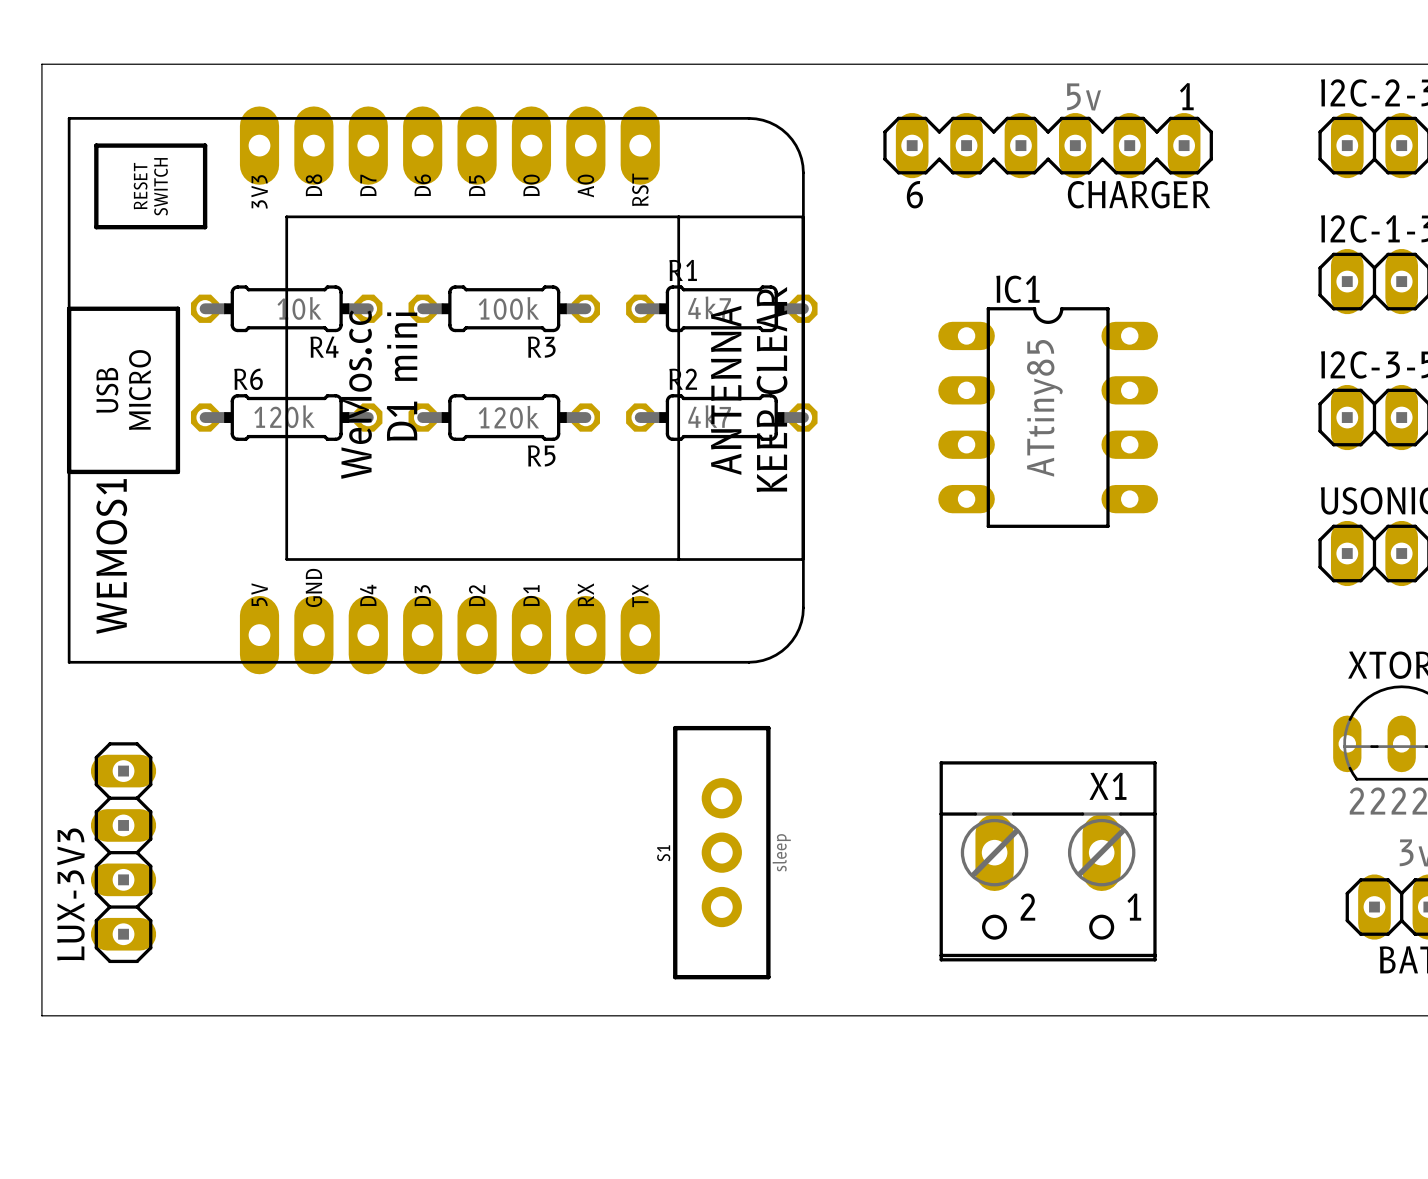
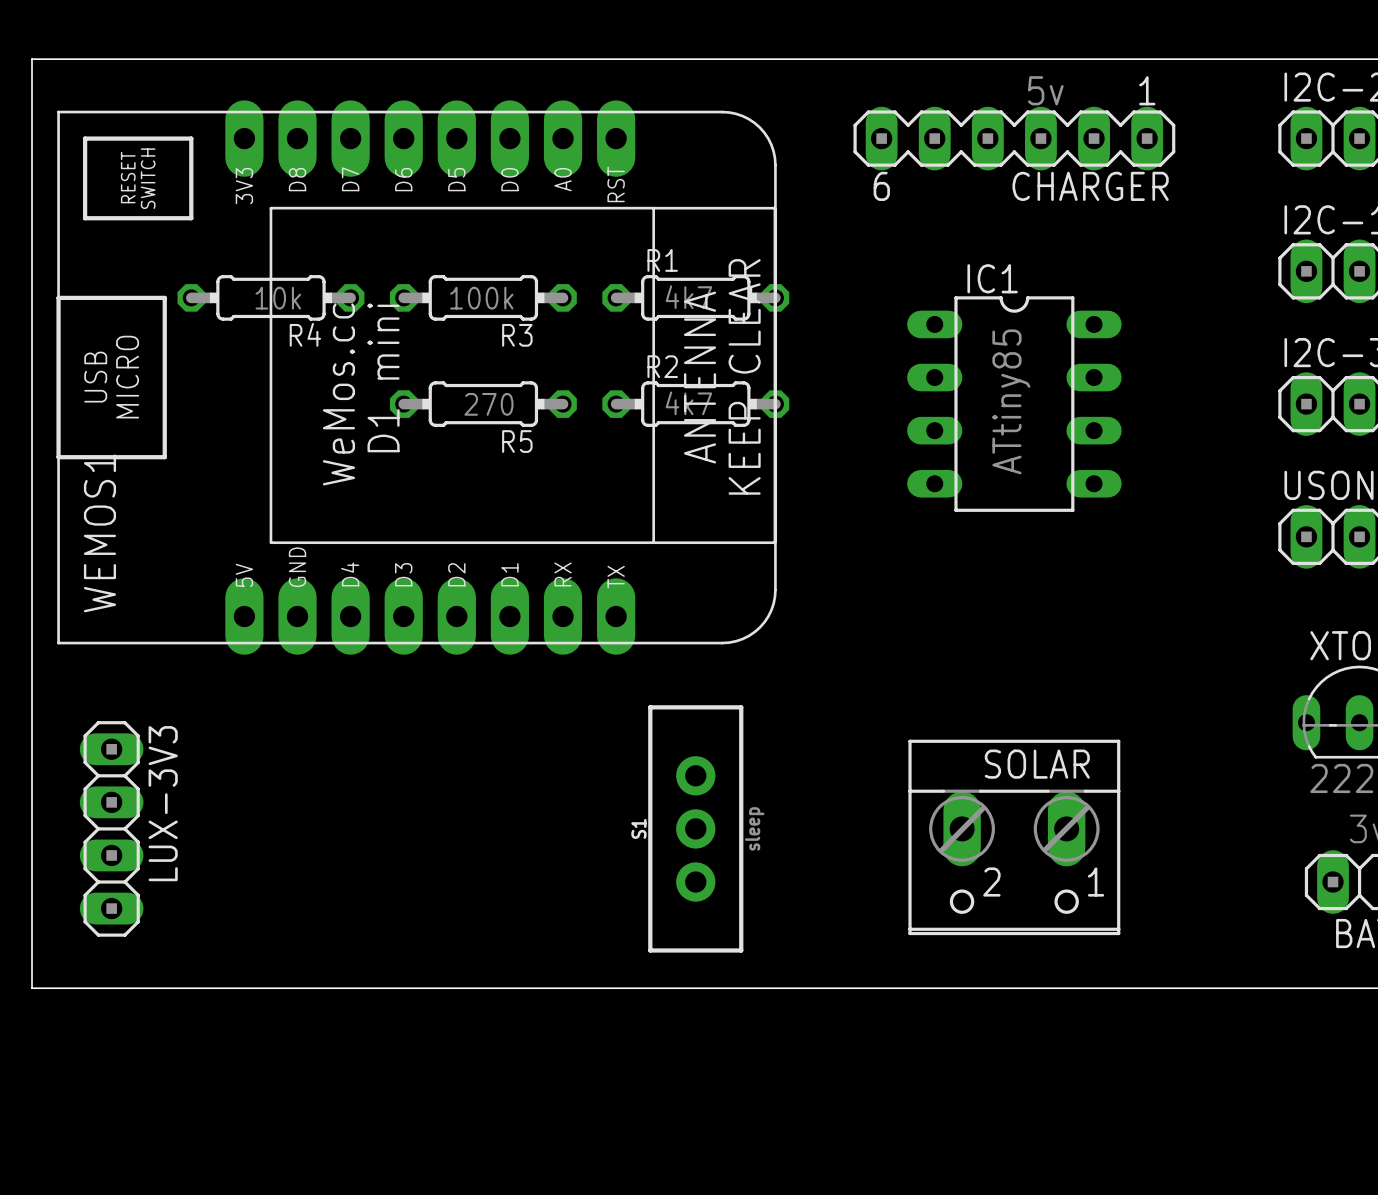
R6: 120k (286, 417) -> none
R5 value: 120k (508, 417) -> 270 (488, 404)
X1 name: X1 (1107, 786) -> SOLAR (1037, 764)
LUX-3V3 name position: LUX-3V3 (70, 894) -> LUX-3V3 (163, 803)

